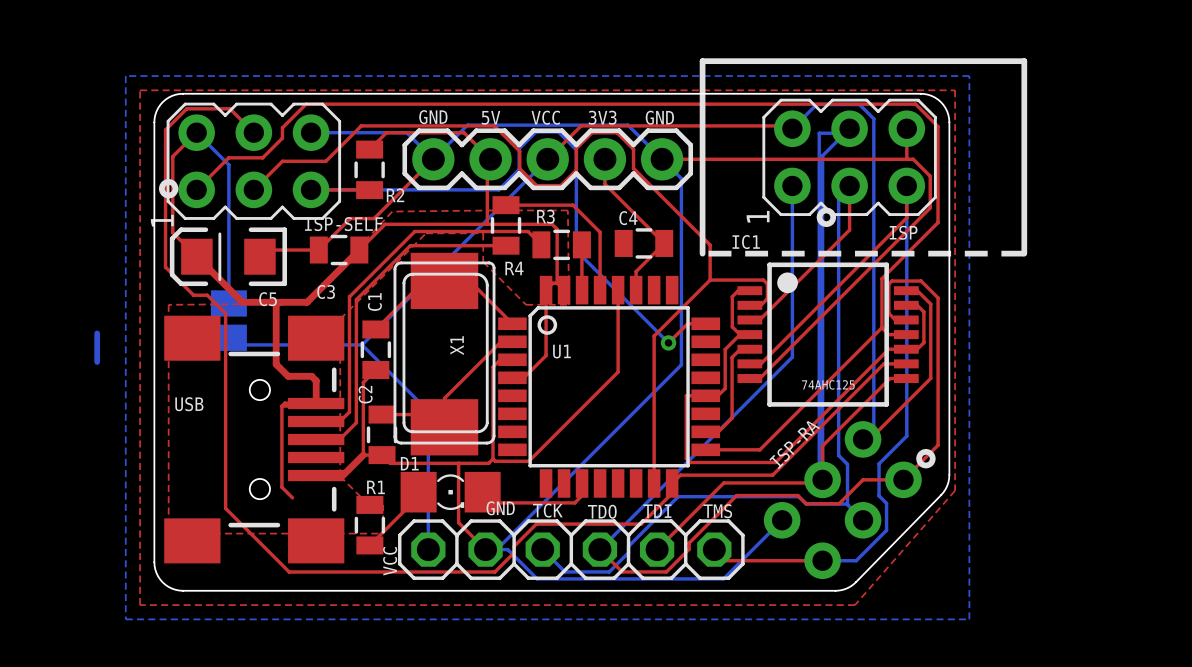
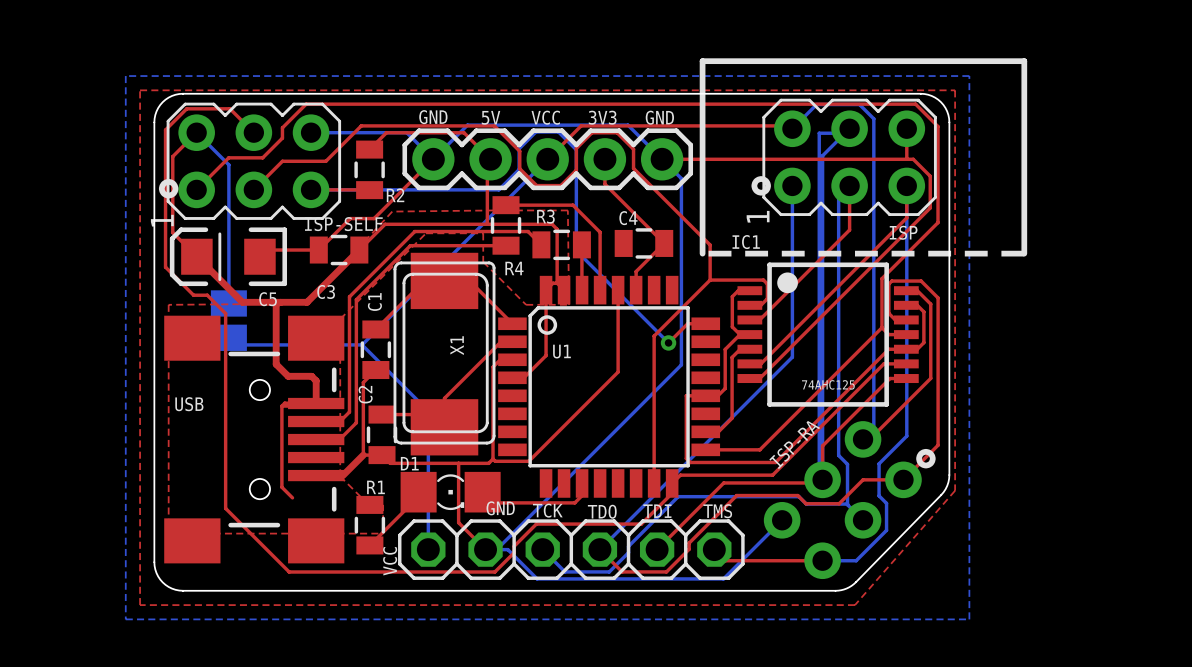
drawing position: (826, 217) -> (761, 185)
bottom track: (97, 333) (97, 362) -> none

